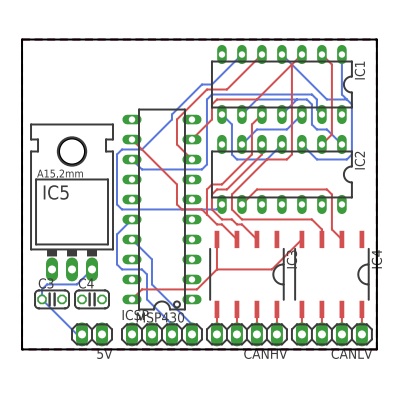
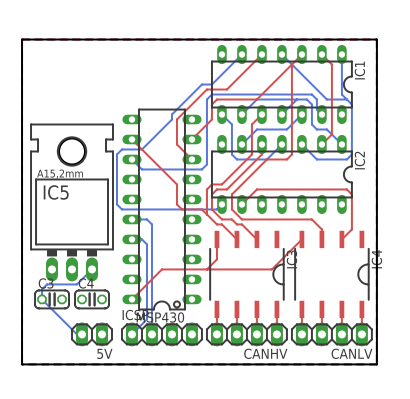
top track: (326, 189) (331, 194) (331, 229) (341, 239) -> (326, 189) (346, 189) (351, 194) (351, 229) (341, 239)
bottom track: (131, 219) (117, 234) (117, 264) (121, 269) (141, 269) (146, 274) -> (131, 219) (146, 219) (151, 224) (151, 259)
bottom track: (131, 239) (151, 259) -> (131, 239) (141, 239) (146, 244) (146, 274)
top track: (216, 259) (216, 269) (196, 289) (141, 289) -> (216, 269) (161, 269) (141, 289)
top track: none -> (216, 259) (206, 269)
bottom track: (151, 284) (191, 324) (191, 334) -> (151, 284) (151, 334)
bottom track: (146, 299) (171, 324) (171, 334) -> (146, 299) (146, 319) (131, 334)
board edge: (22, 349) (376, 349) -> (22, 349) (22, 364) (376, 364) (376, 349)

